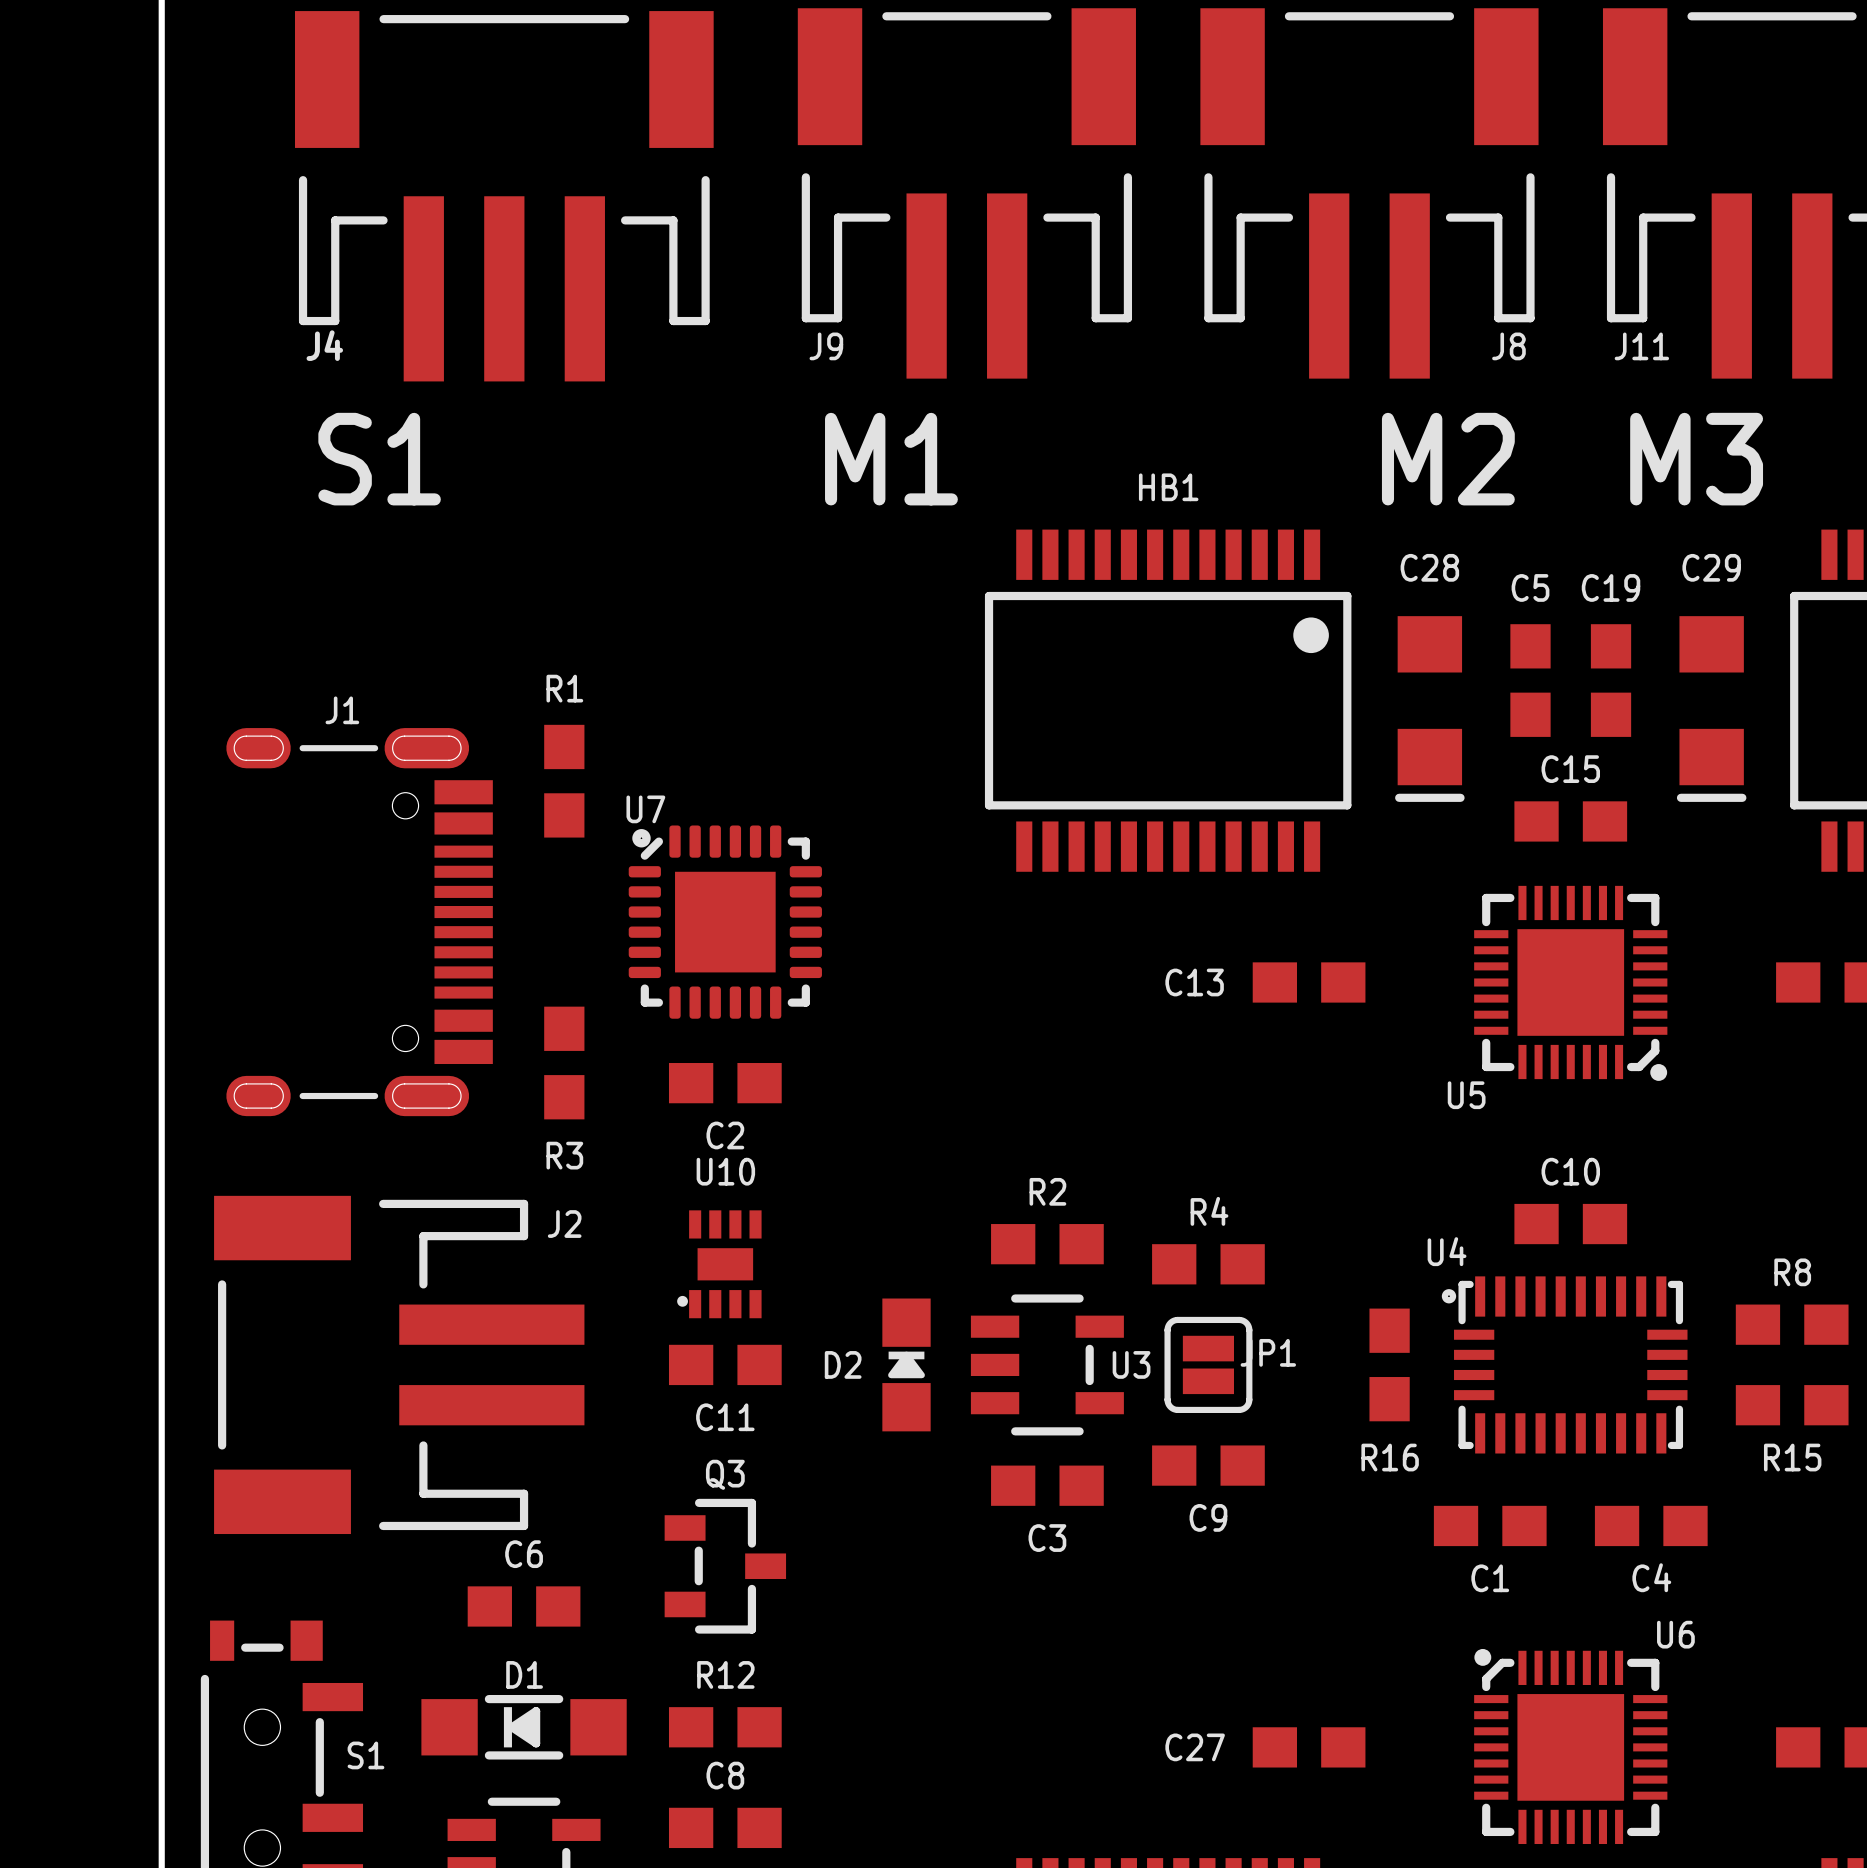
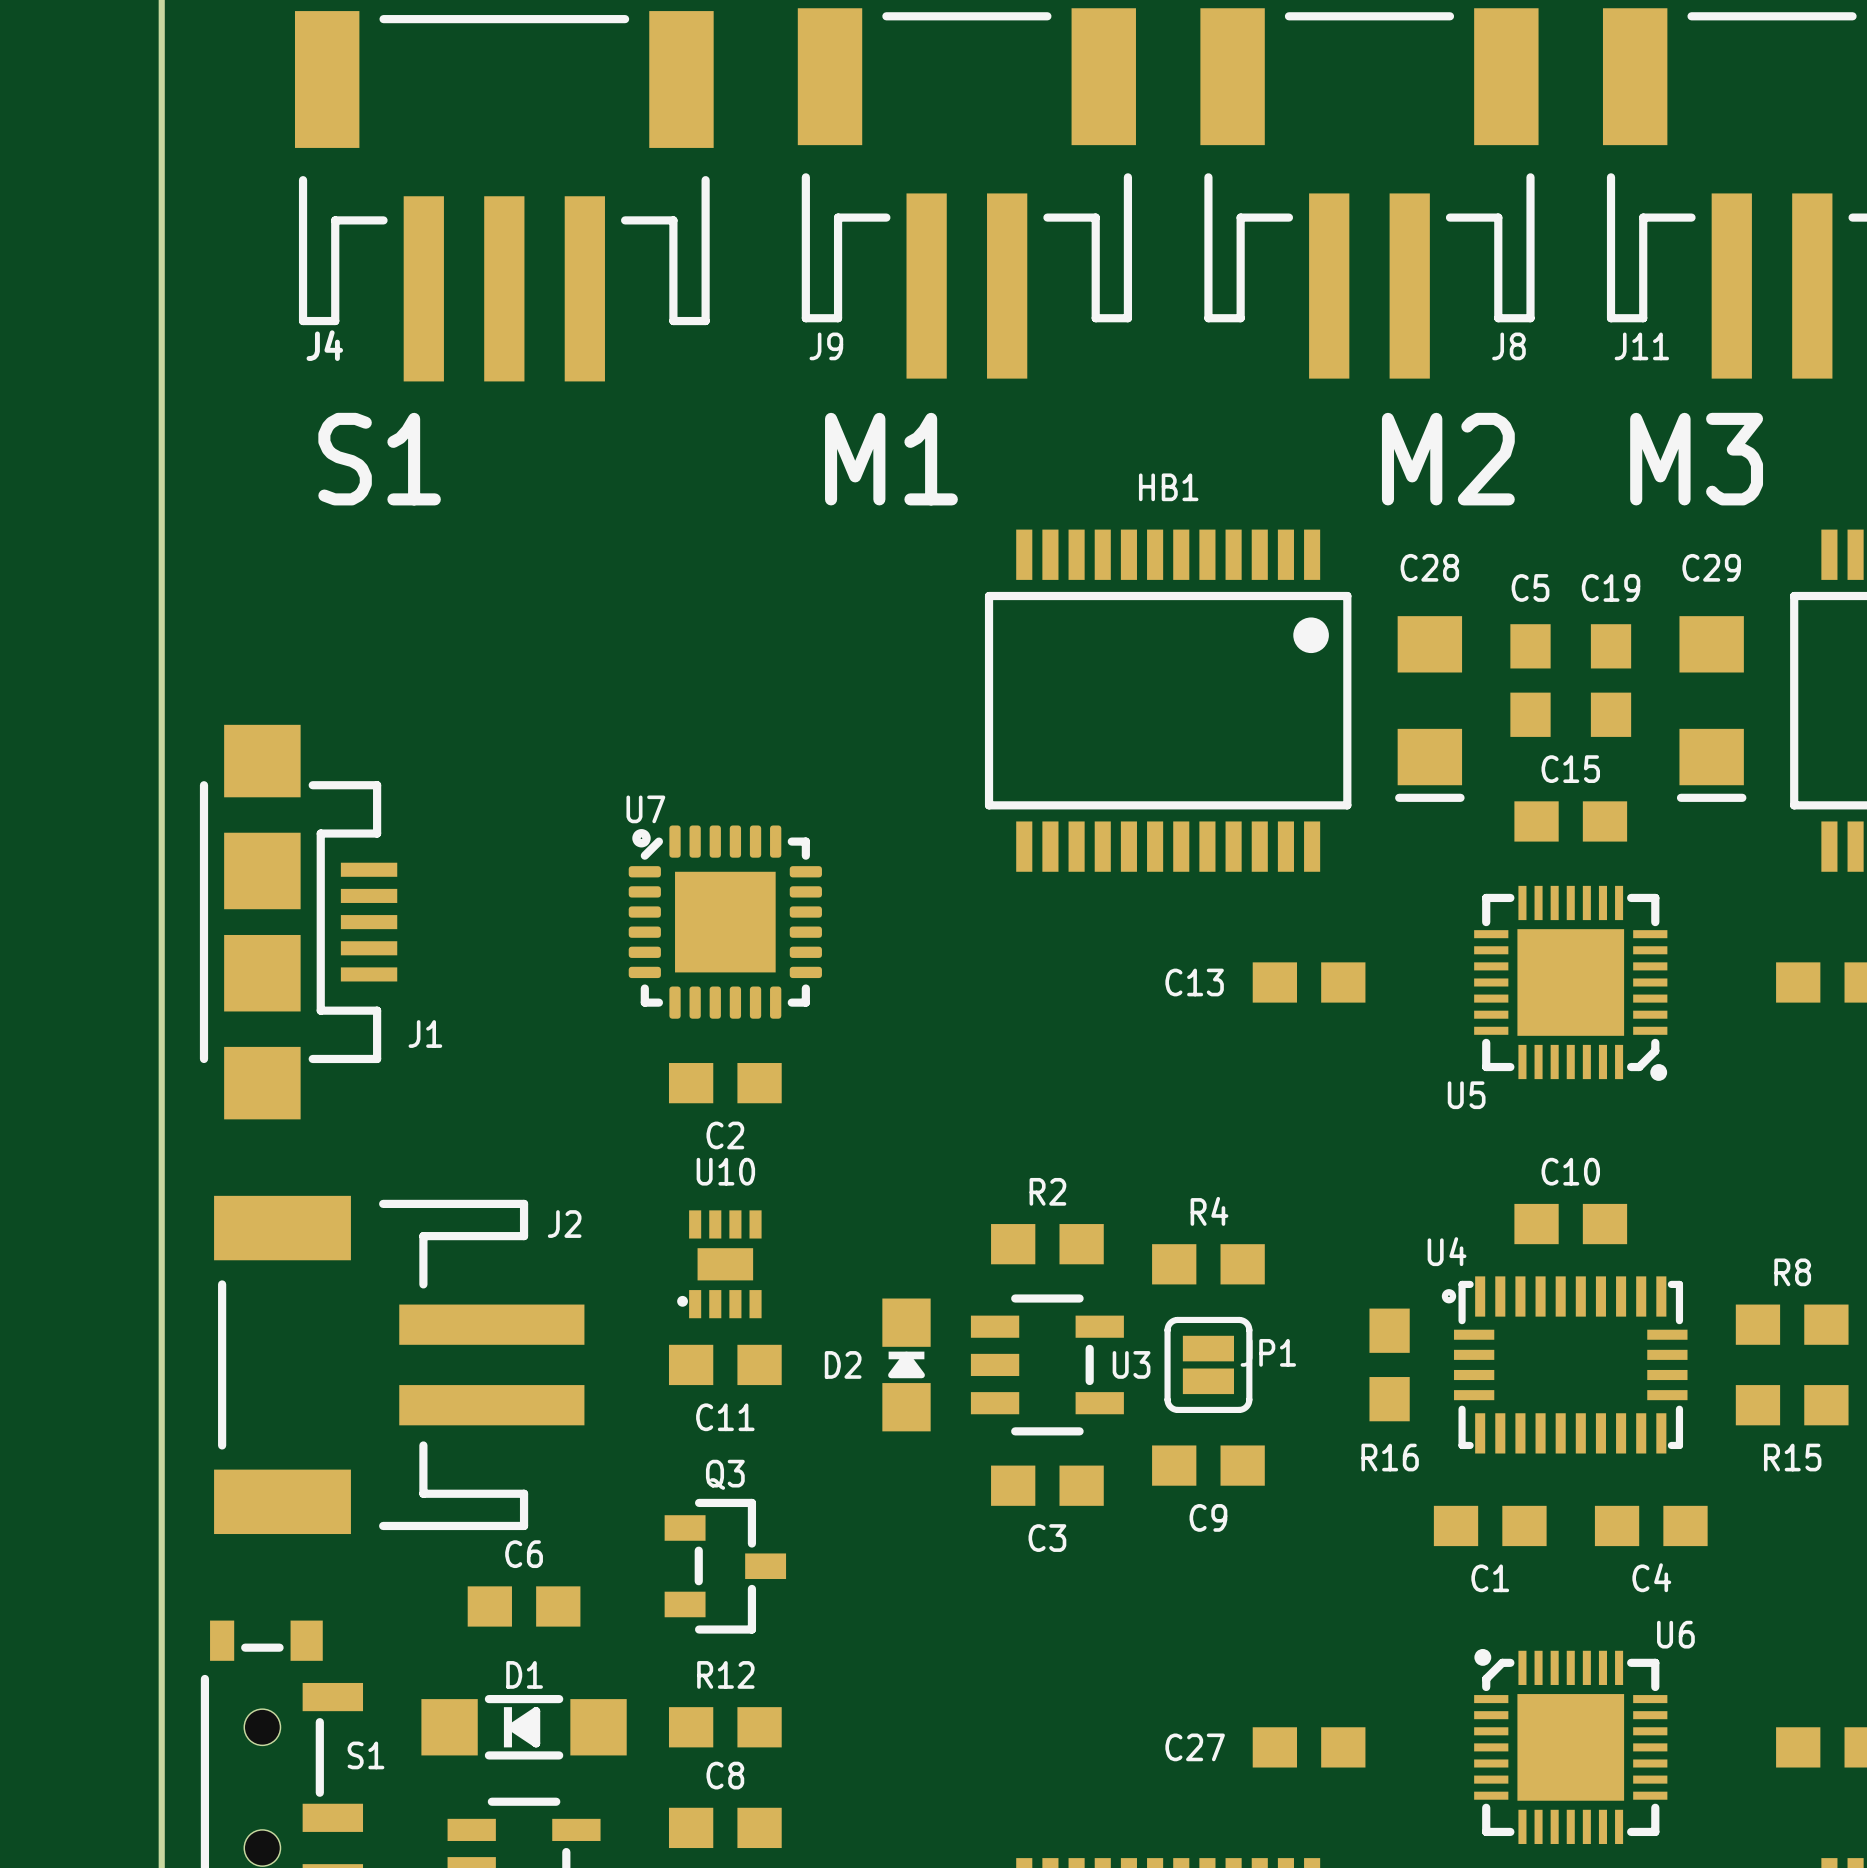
J1 name position: J1 (342, 710) -> J1 (425, 1034)
J1 footprint: [226, 728, 493, 1117] -> [199, 724, 398, 1120]
R1: (564, 781) -> none
R3: (564, 1063) -> none

